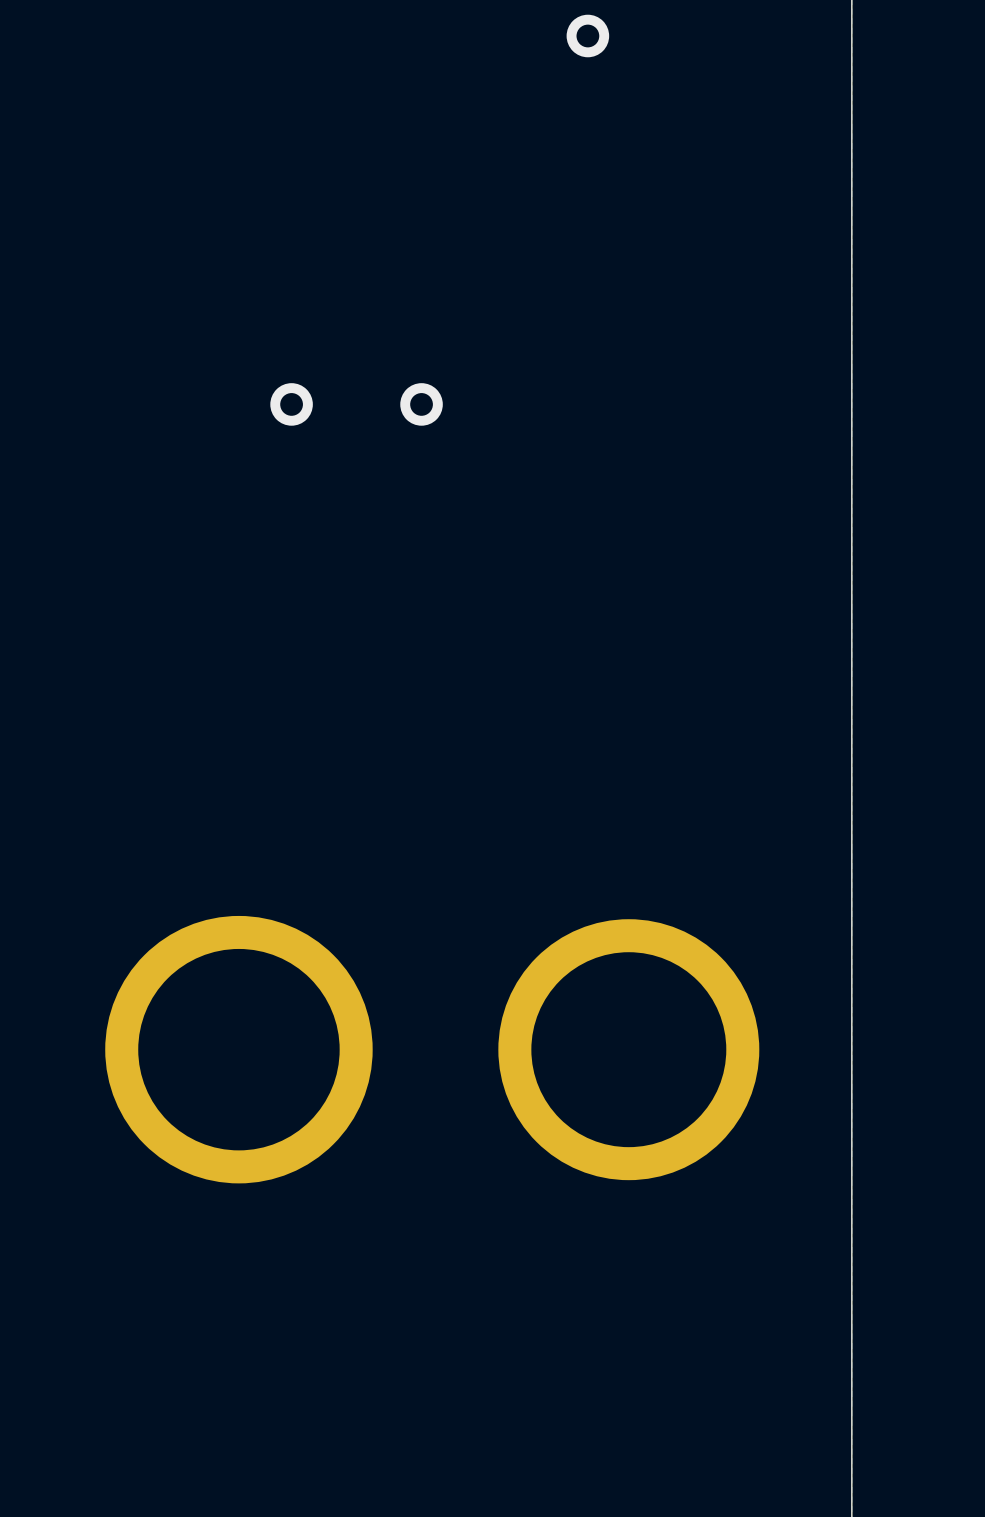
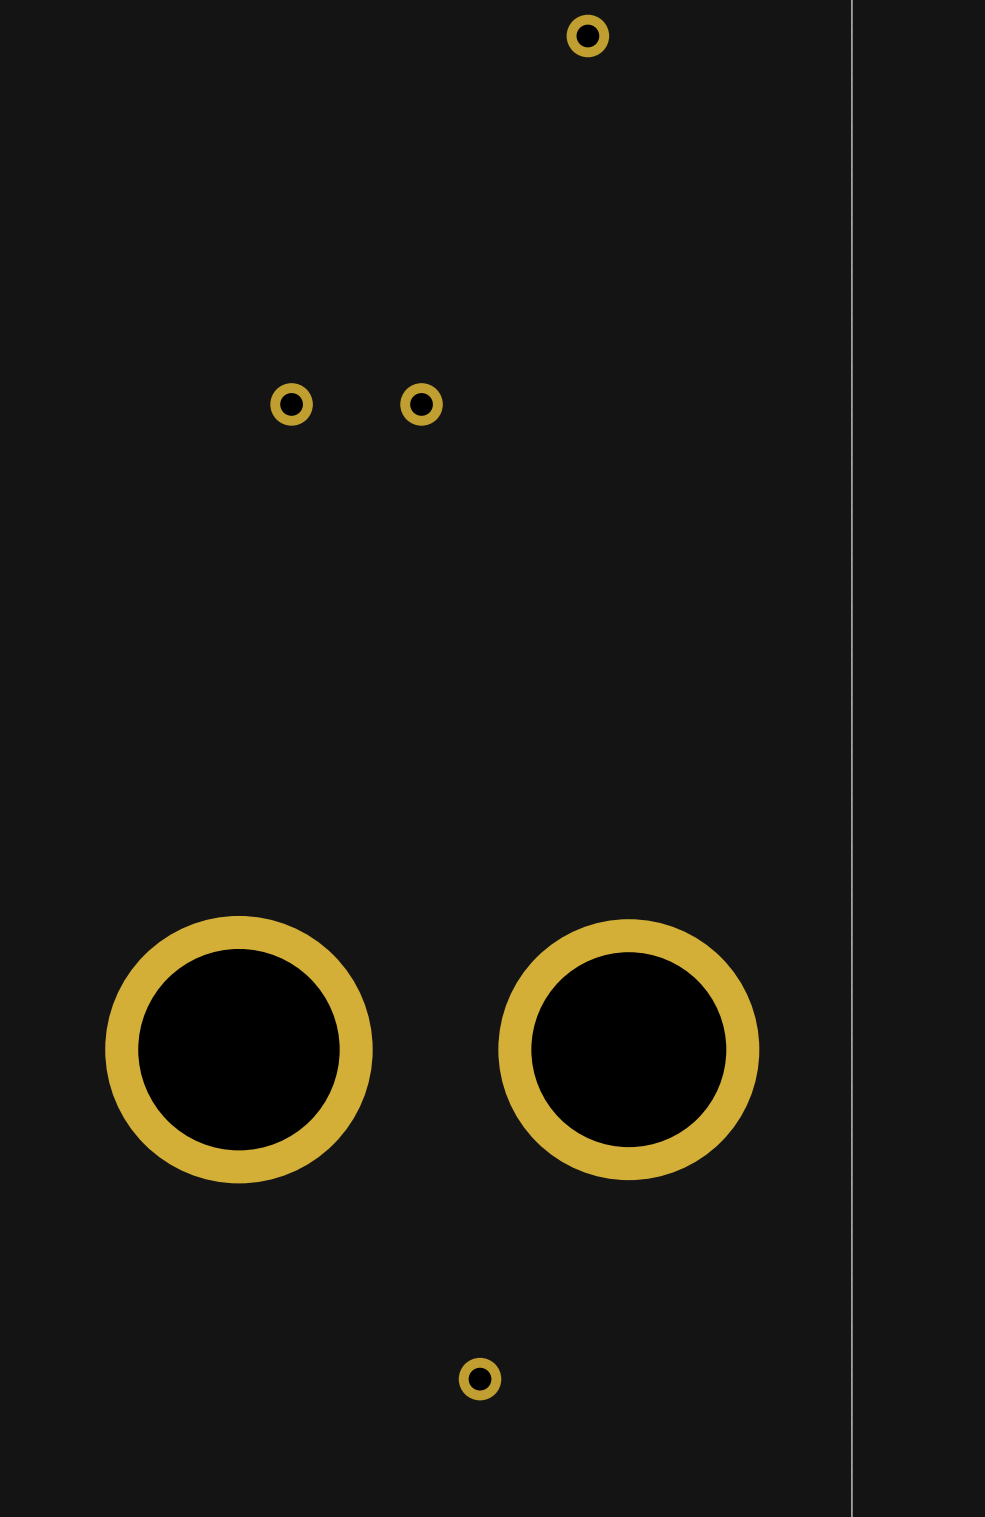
via: none -> (480, 1379)

